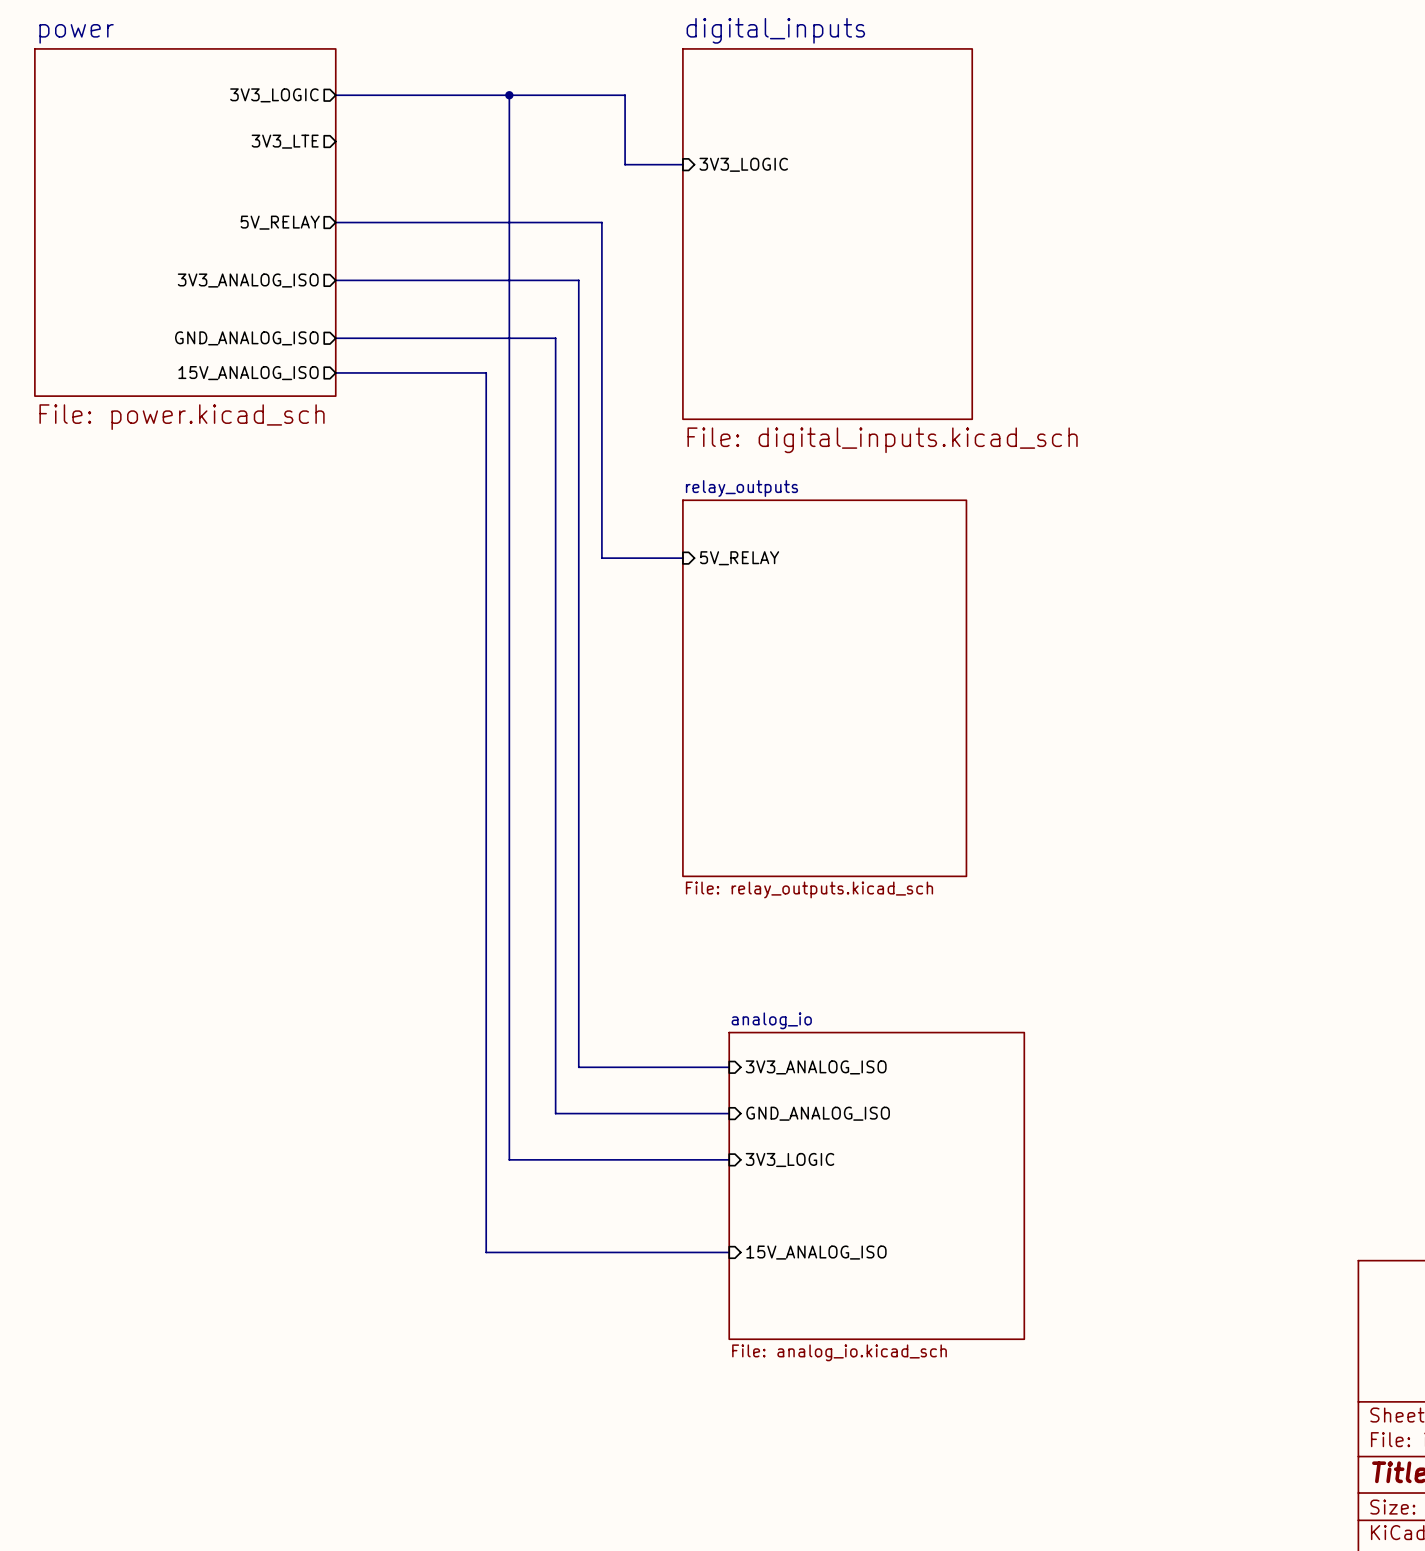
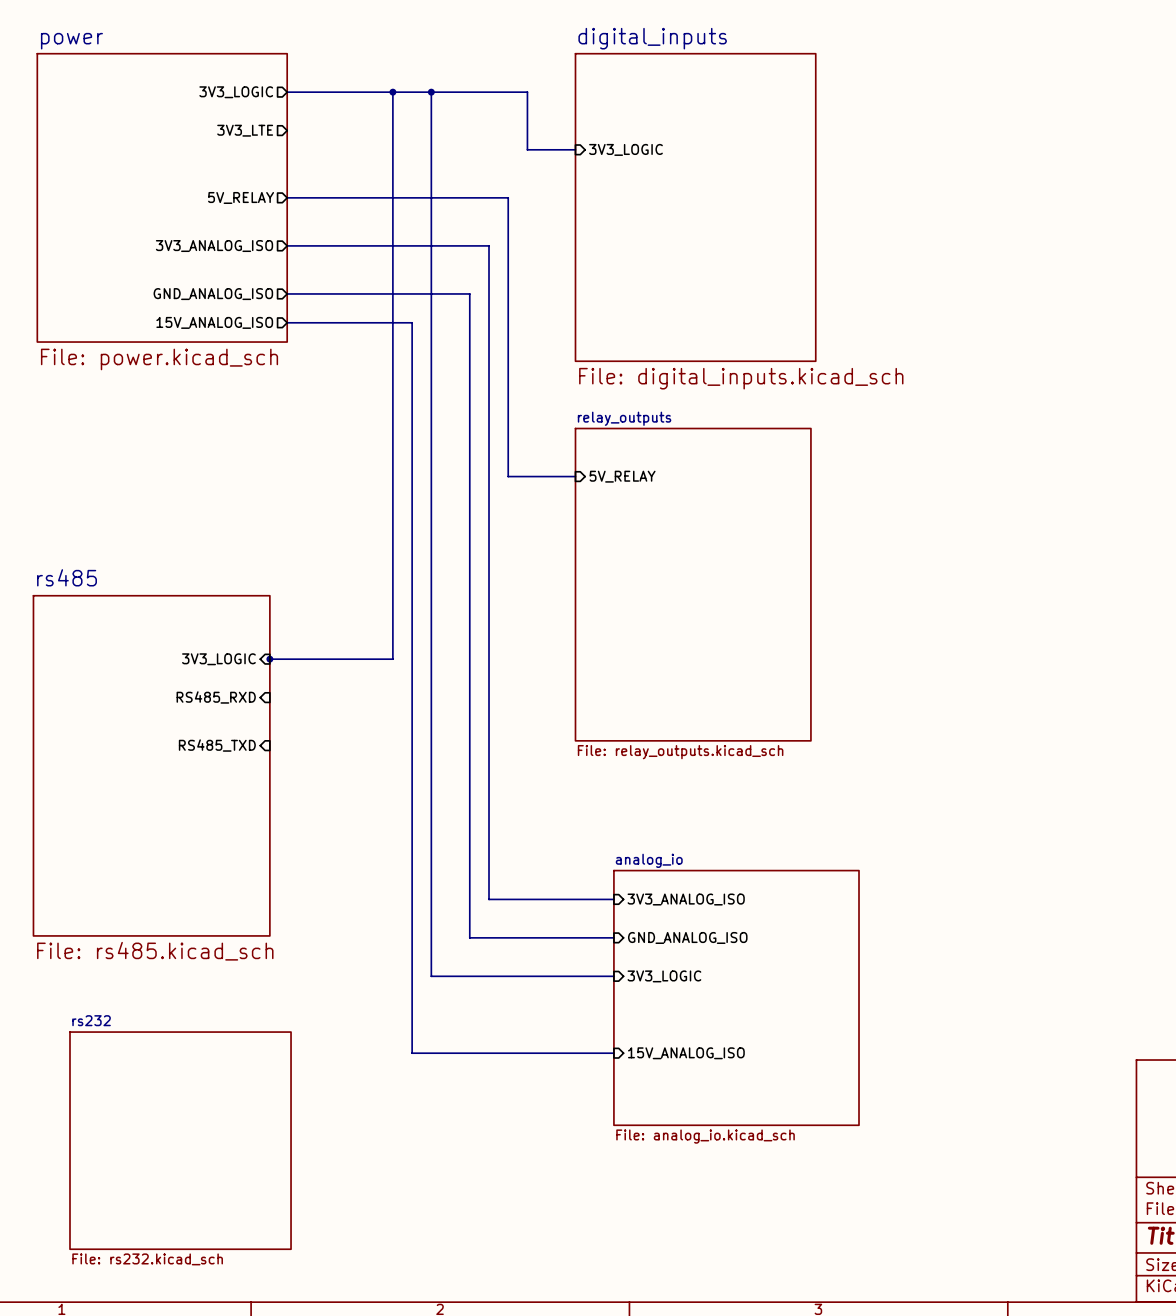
wire: none -> (392, 92) (392, 659) (267, 659)
junction: none -> (392, 92)
junction: none -> (269, 659)
sheet pin: none -> 3V3_LOGIC (218, 659)
sheet pin: none -> RS485_RXD (216, 697)
sheet pin: none -> RS485_TXD (217, 745)
sheet rs485: none -> File: rs485.kicad_sch (151, 765)
sheet rs232: none -> File: rs232.kicad_sch (180, 1140)

